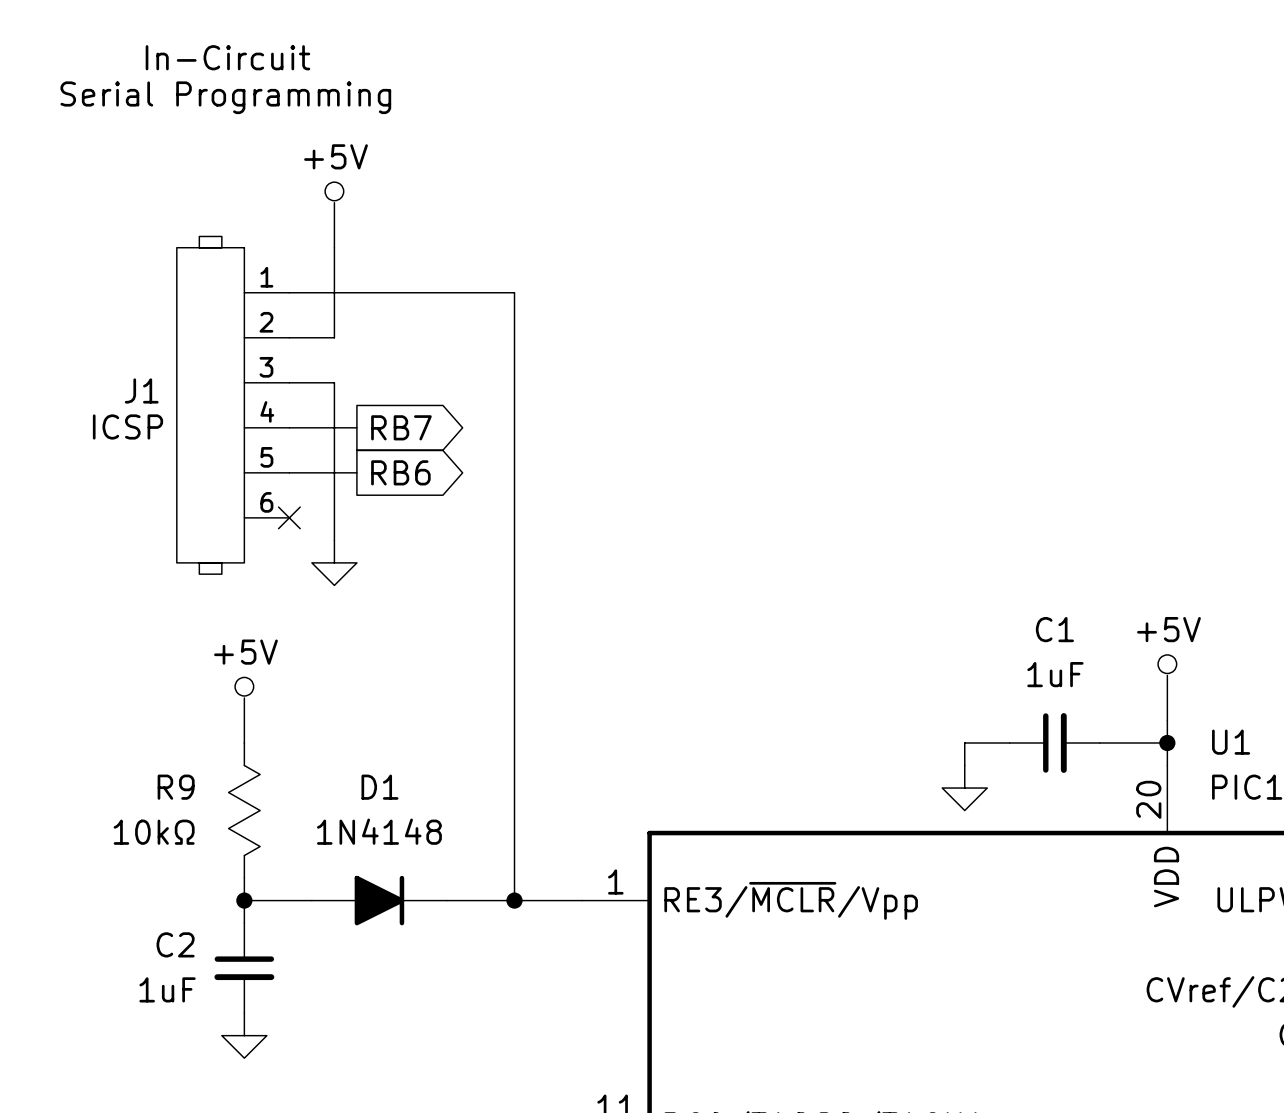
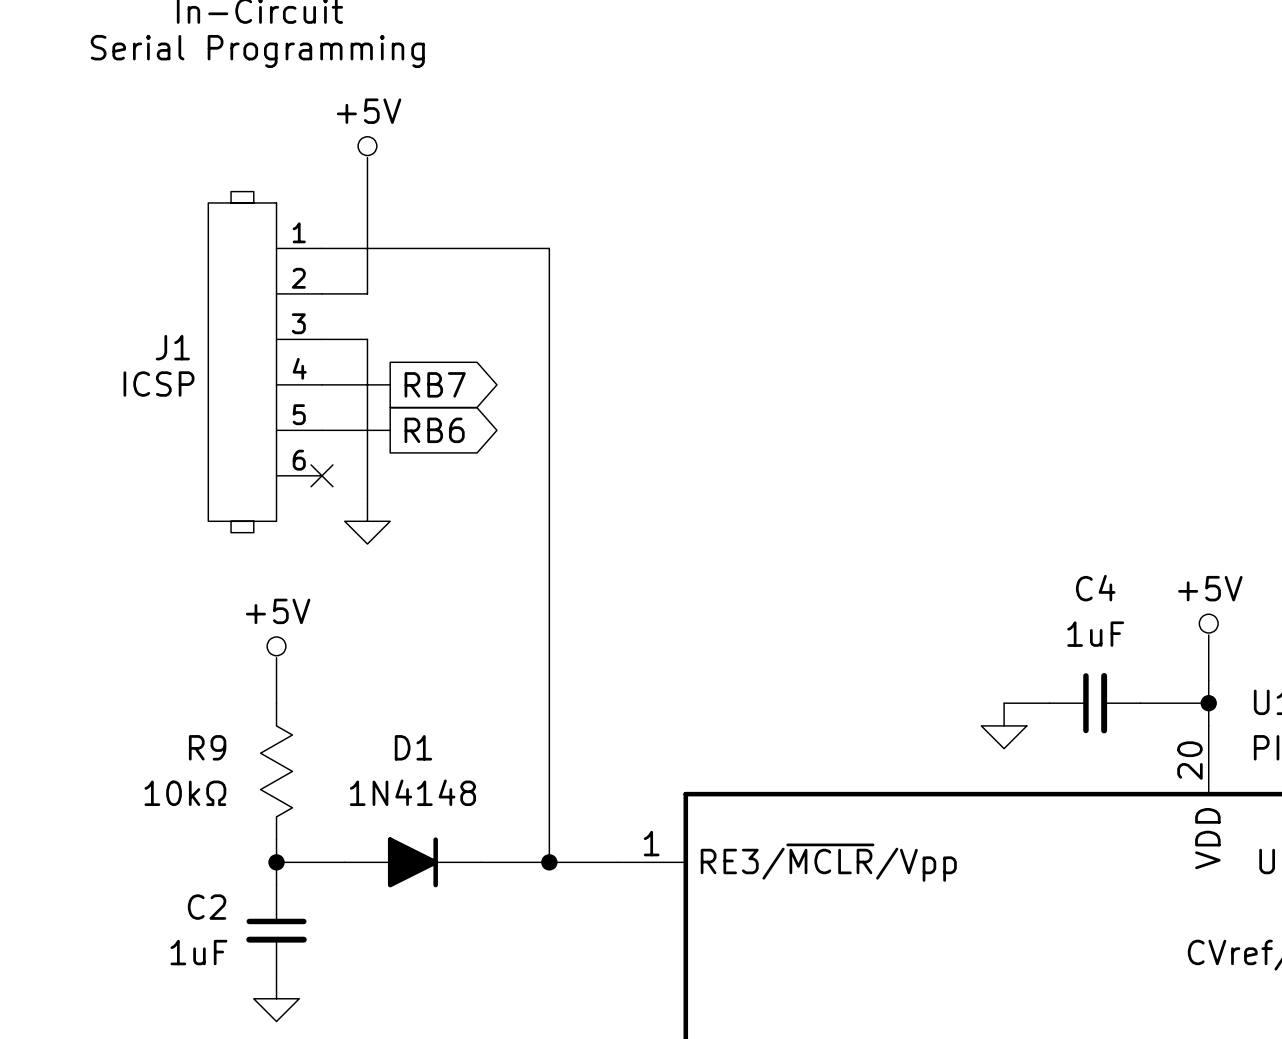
C1 name: C1 (1054, 629) -> C4 (1095, 588)
power symbol: none -> (1004, 725)
power symbol: (964, 788) -> none

